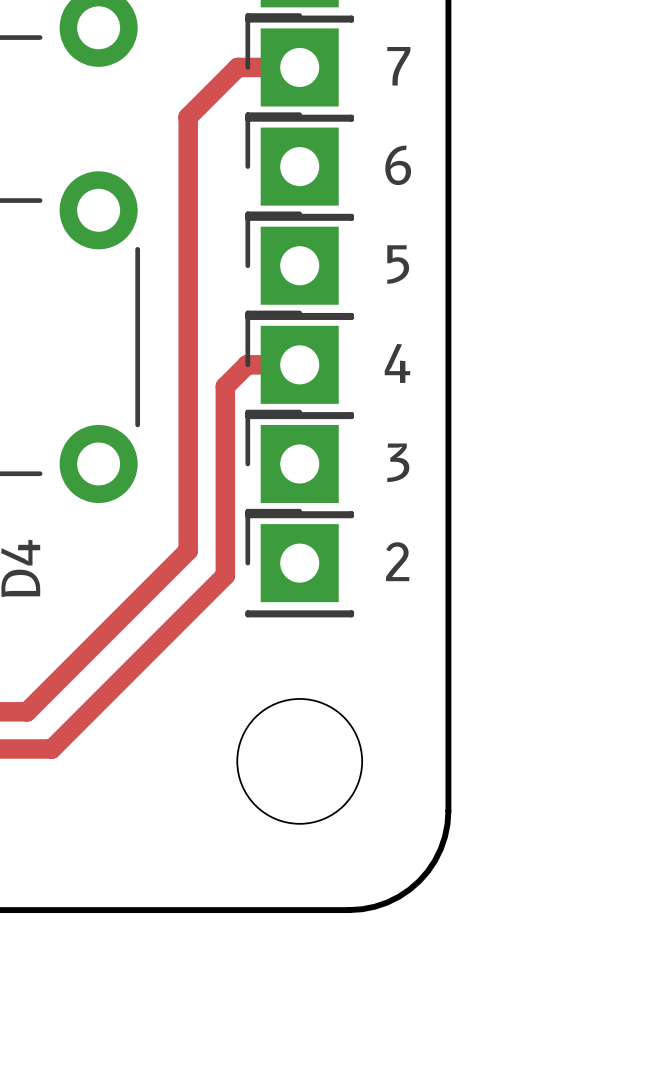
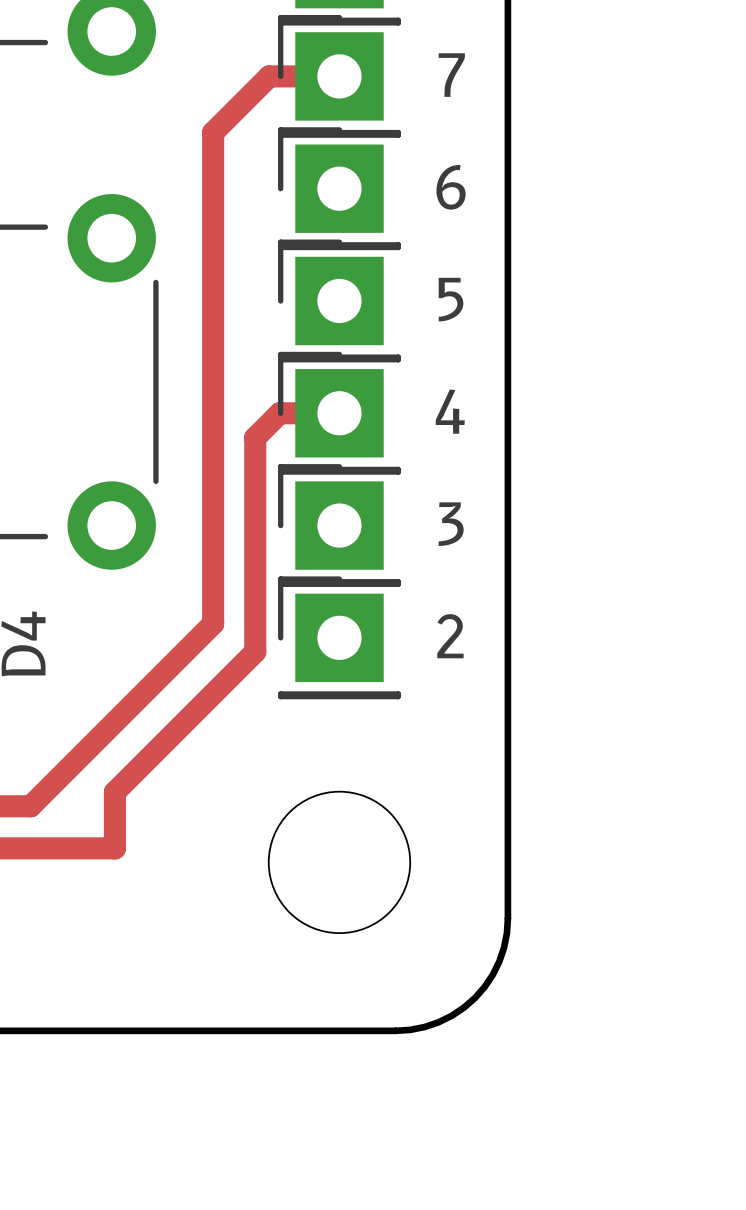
track: (101, 699) (51, 749) -> (114, 792) (114, 848) (58, 848)

